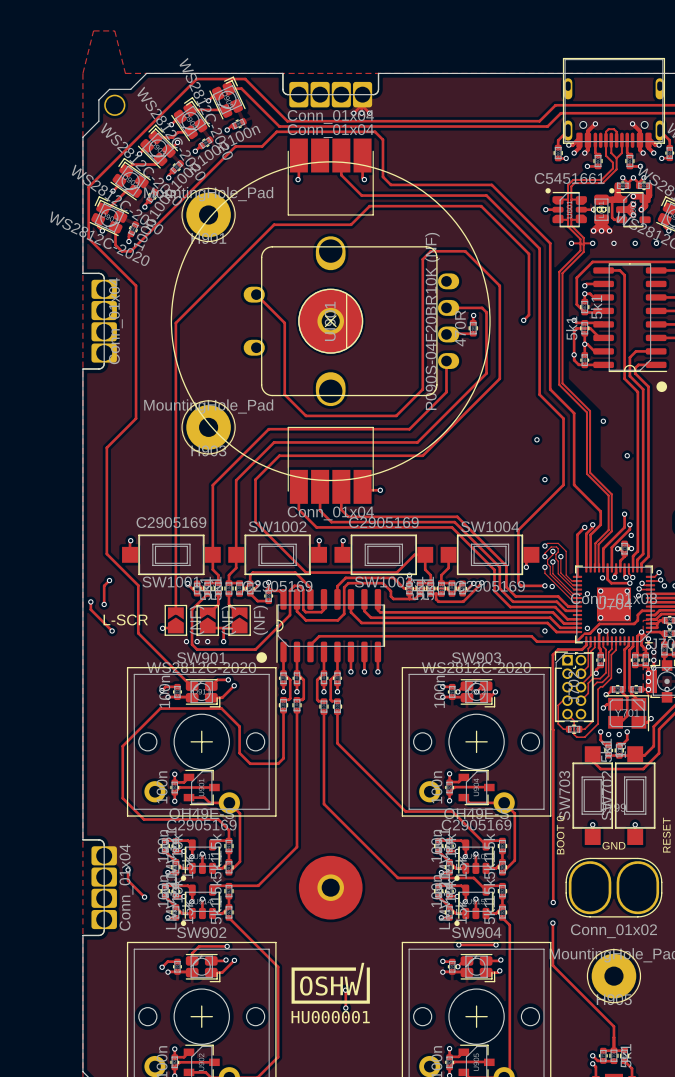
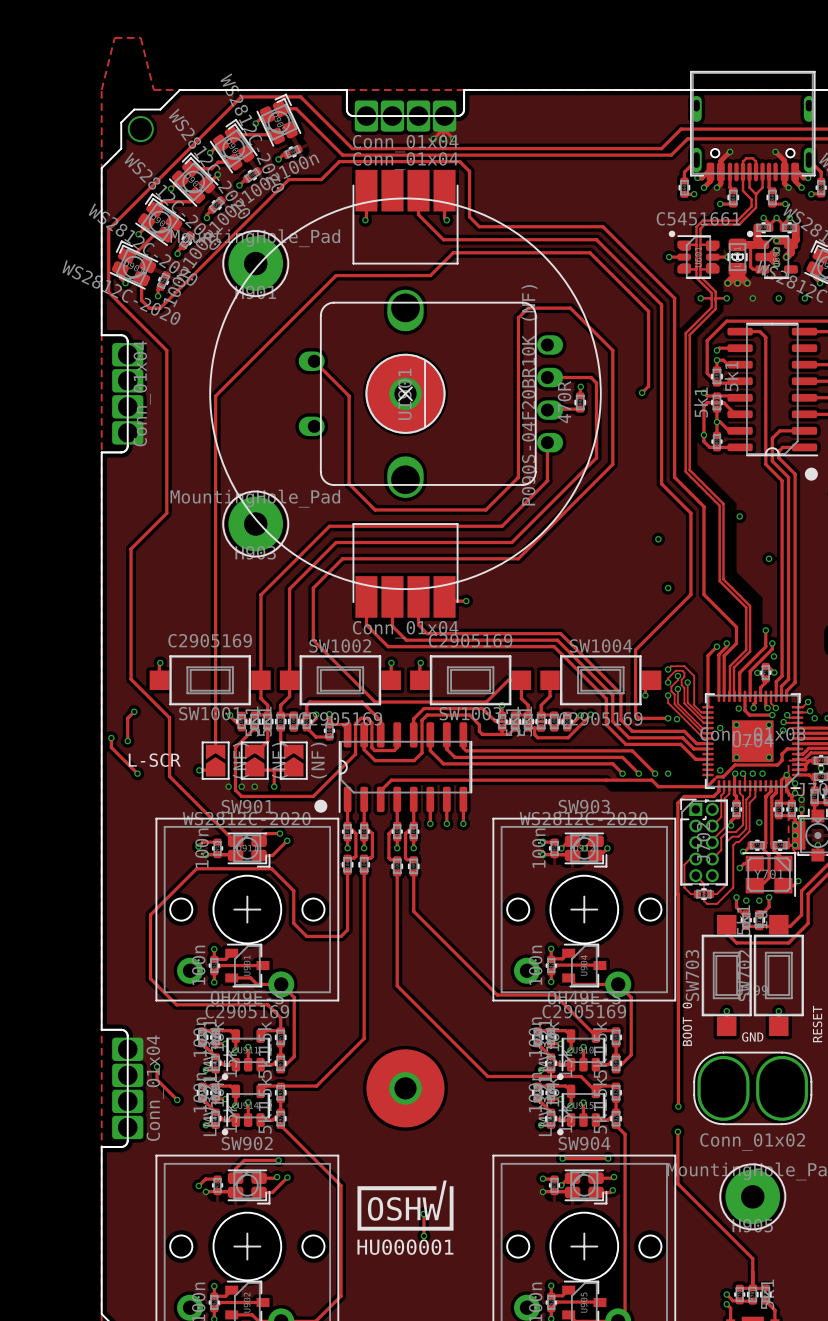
track: (515, 612) (552, 612) (564, 623) (577, 623) -> (632, 750) (655, 773)
track: (507, 617) (550, 617) (560, 627) (577, 627) -> (622, 757) (638, 773)
track: (499, 623) (547, 623) (556, 632) (577, 632) -> (612, 763) (622, 773)
via: none -> (622, 773)
via: none -> (638, 773)
via: none -> (655, 773)

